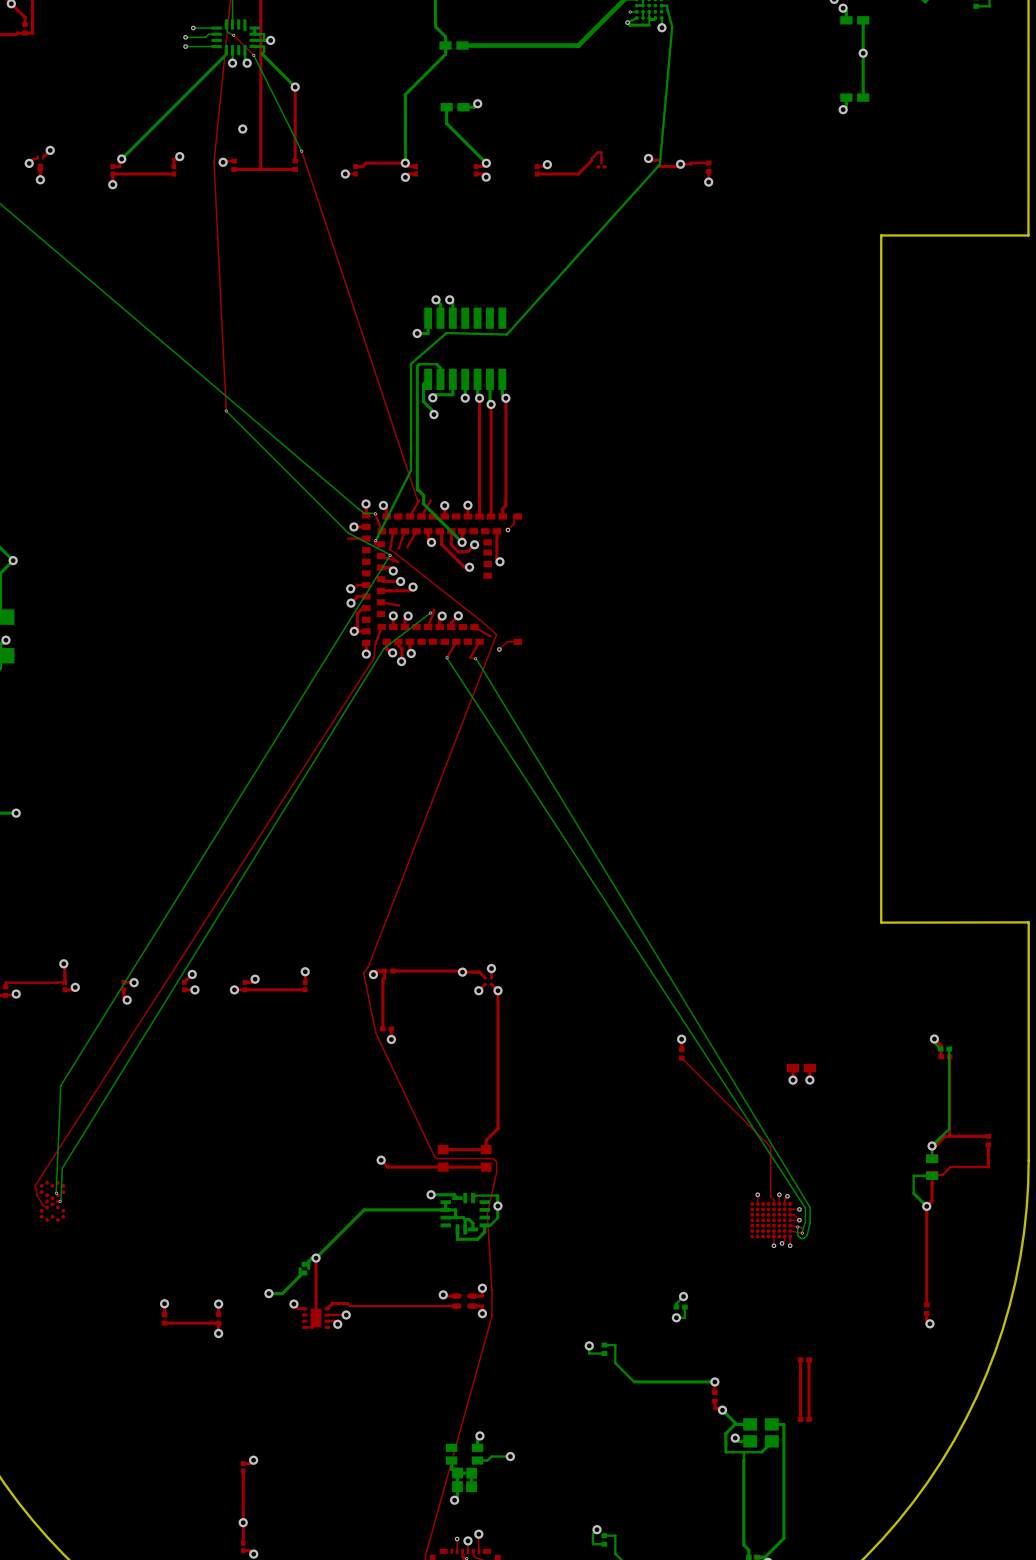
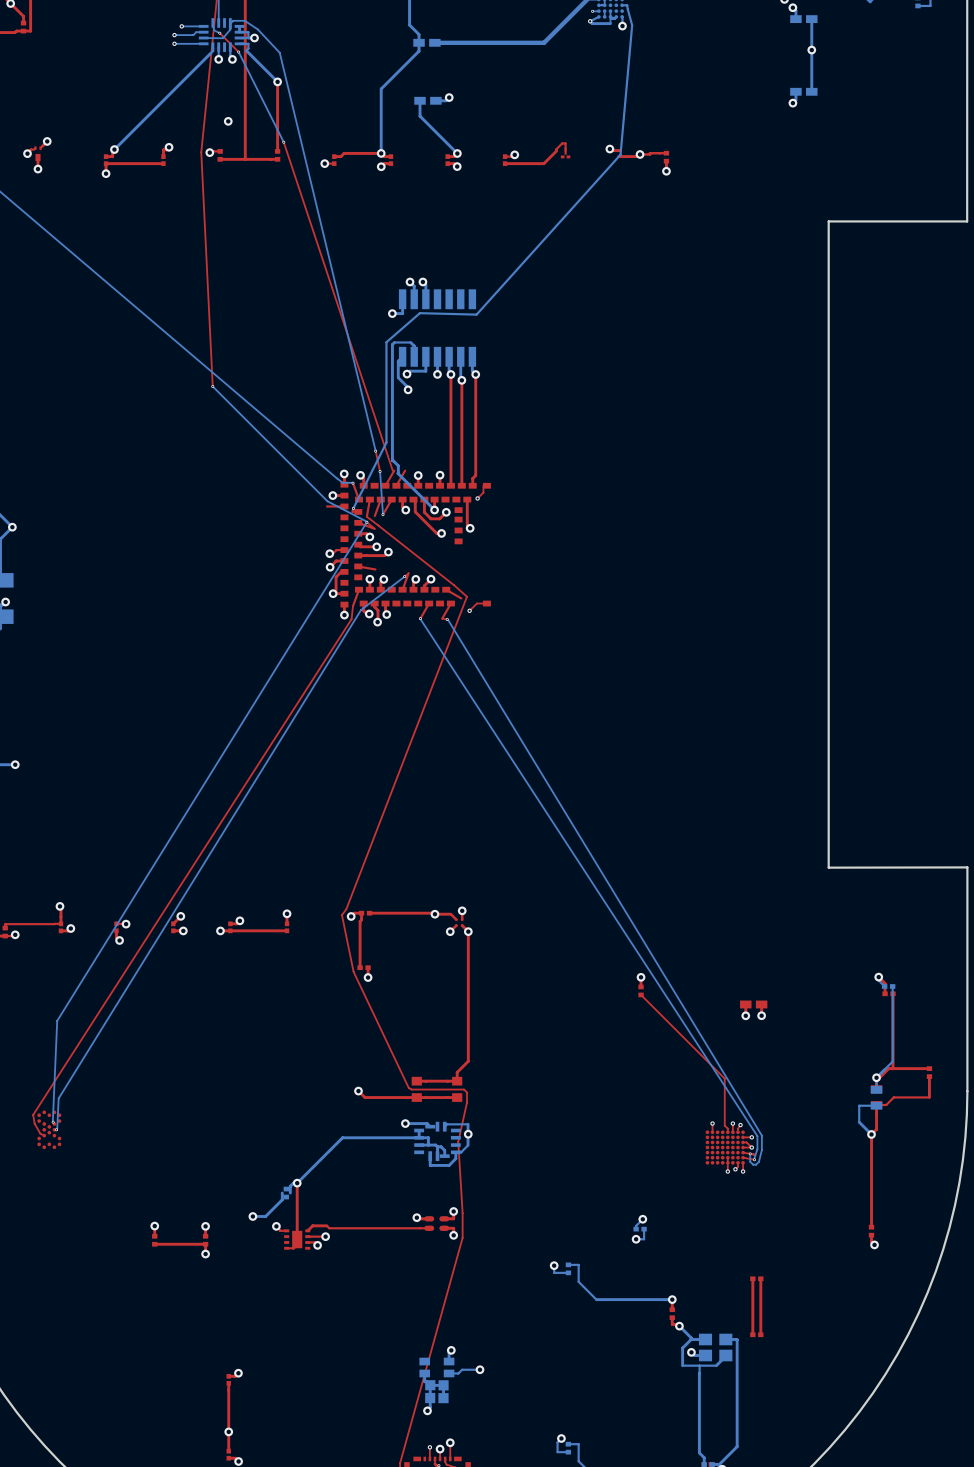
bottom track: none -> (203, 38) (223, 38) (230, 29) (230, 23) (233, 20) (244, 20) (257, 29) (279, 52) (375, 451)
top track: none -> (375, 451) (380, 471)
via: none -> (375, 451)
bottom track: none -> (380, 471) (382, 514)
via: none -> (380, 471)
via: none -> (382, 514)

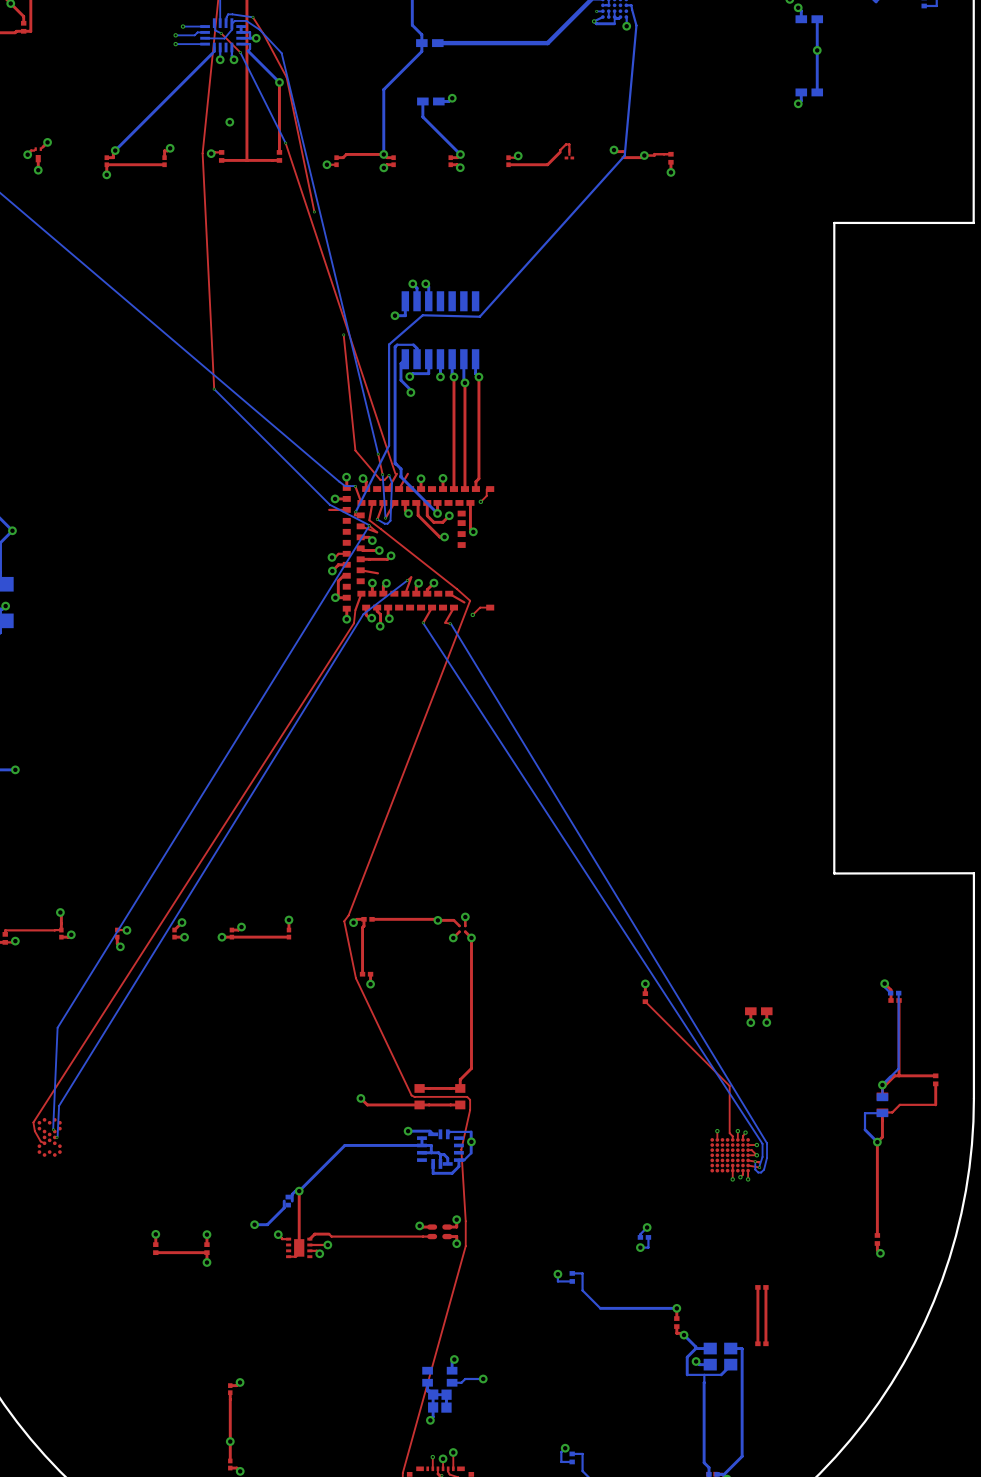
top track: none -> (252, 17) (286, 77) (314, 211)
bottom track: none -> (252, 17) (228, 14) (226, 23)
via: none -> (252, 17)
via: none -> (314, 211)
top track: none -> (343, 334) (355, 450) (380, 479) (384, 479) (389, 475)
via: none -> (343, 334)
bottom track: none -> (389, 475) (392, 482) (390, 520) (384, 523) (377, 519)
via: none -> (389, 475)
via: none -> (377, 519)

